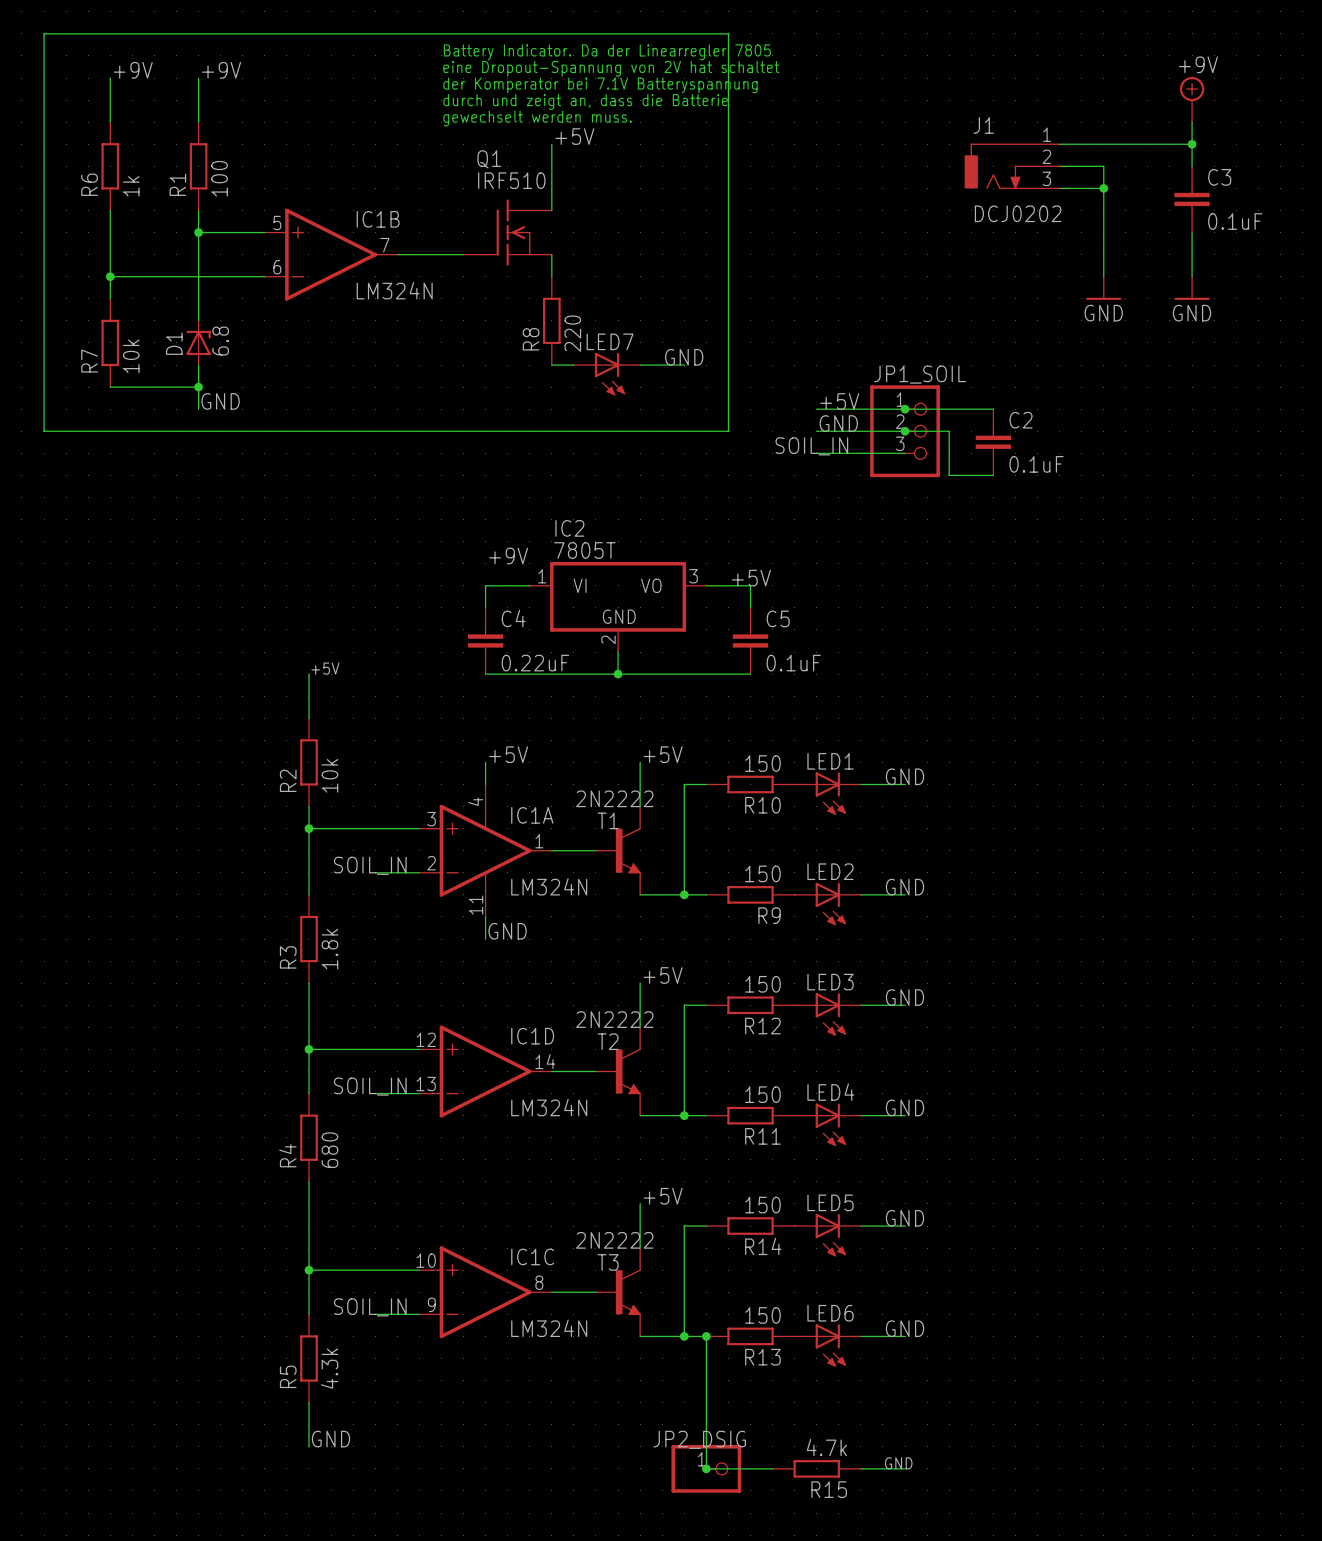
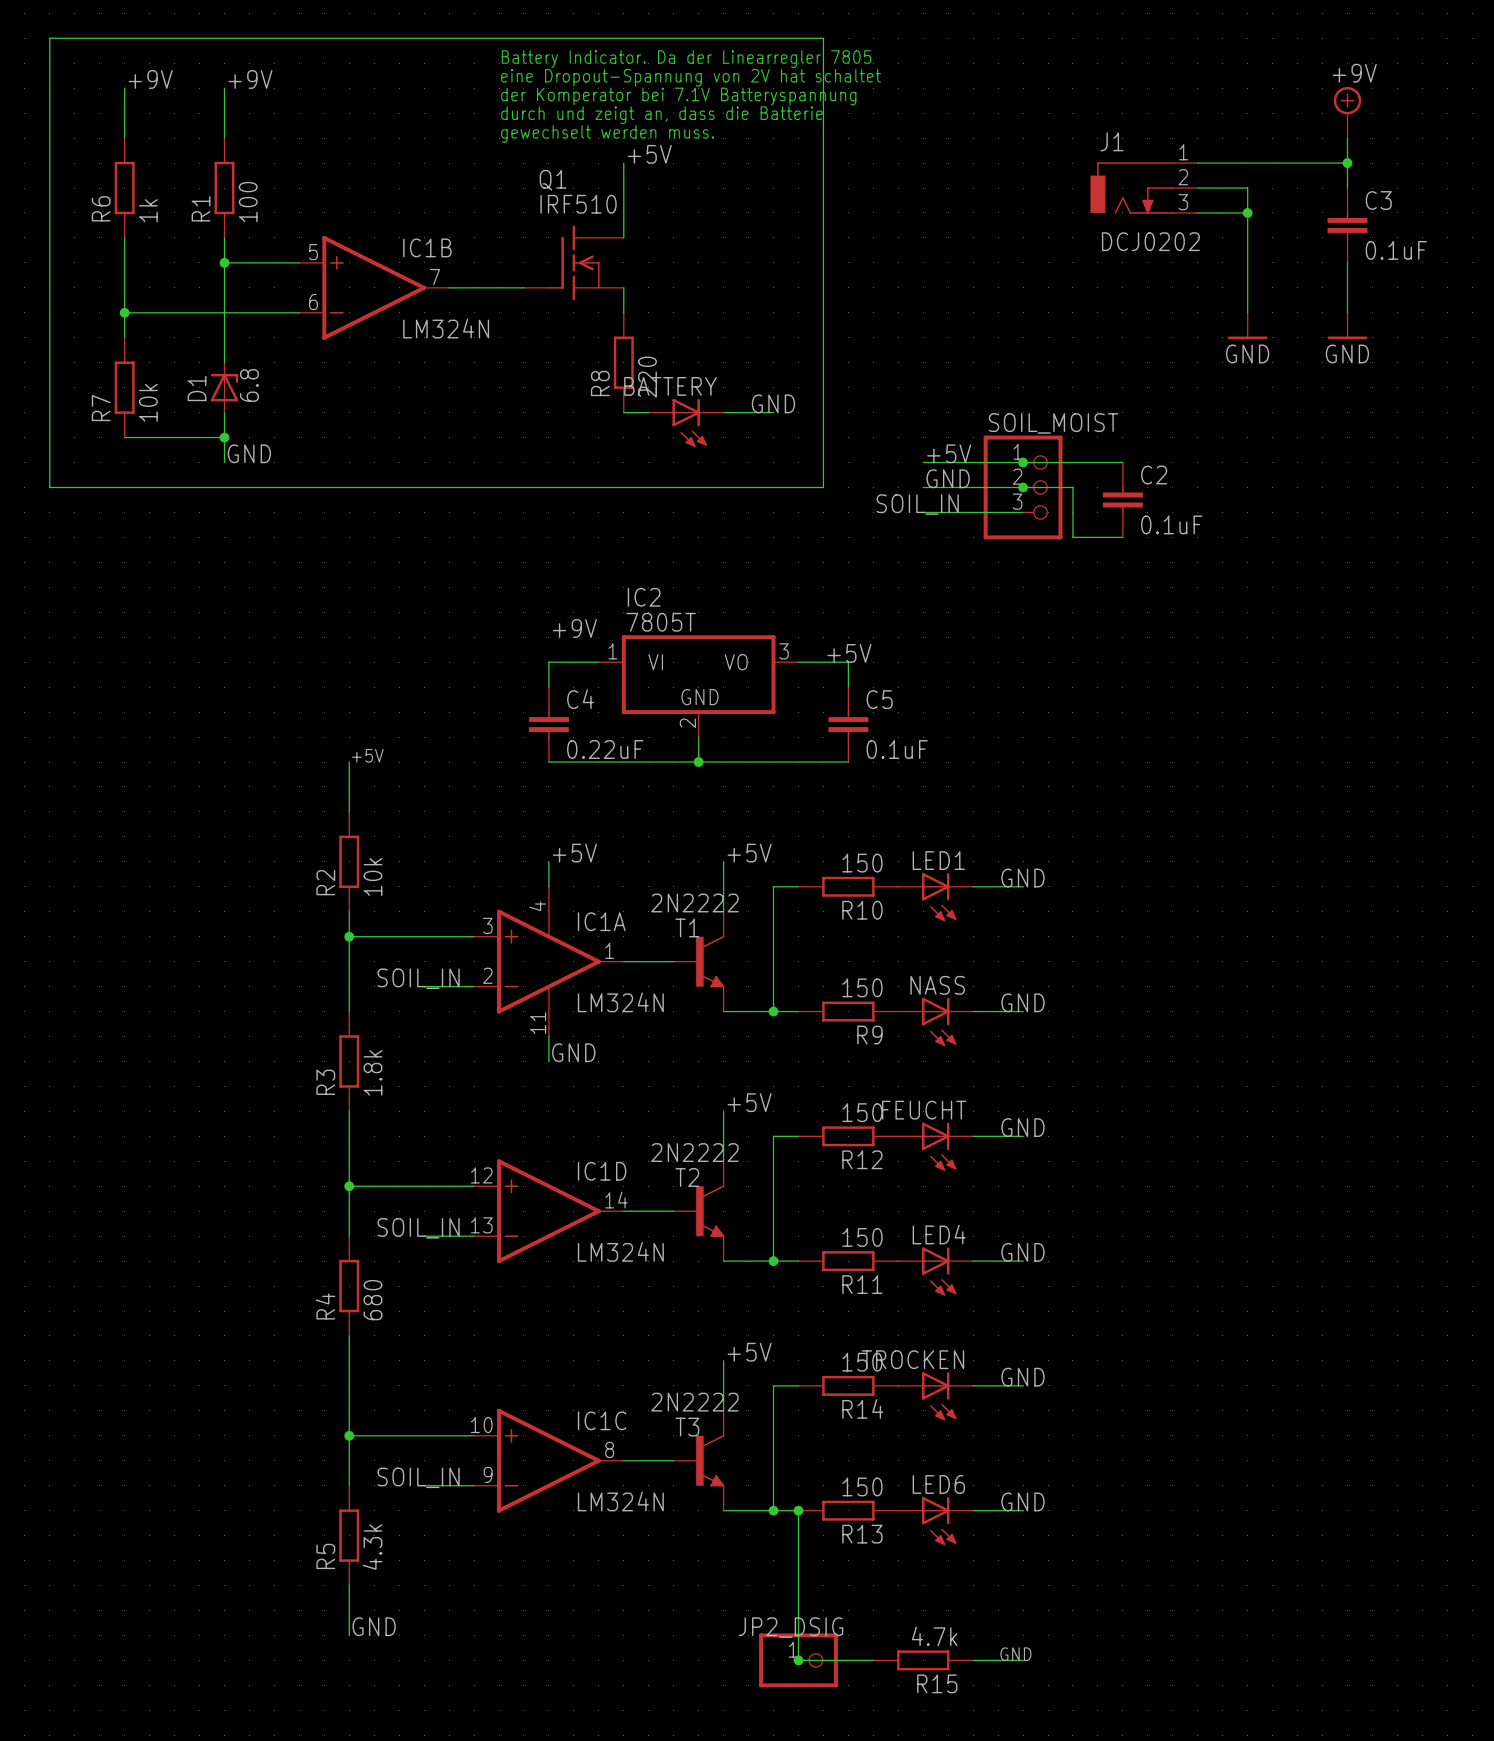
LED7 name: LED7 (610, 341) -> BATTERY (670, 386)
JP1_SOIL name: JP1_SOIL (920, 374) -> SOIL_MOIST (1053, 423)
LED2 name: LED2 (830, 871) -> NASS (937, 985)
LED3 name: LED3 (830, 982) -> FEUCHT (924, 1110)
LED5 name: LED5 (830, 1202) -> TROCKEN (912, 1359)

